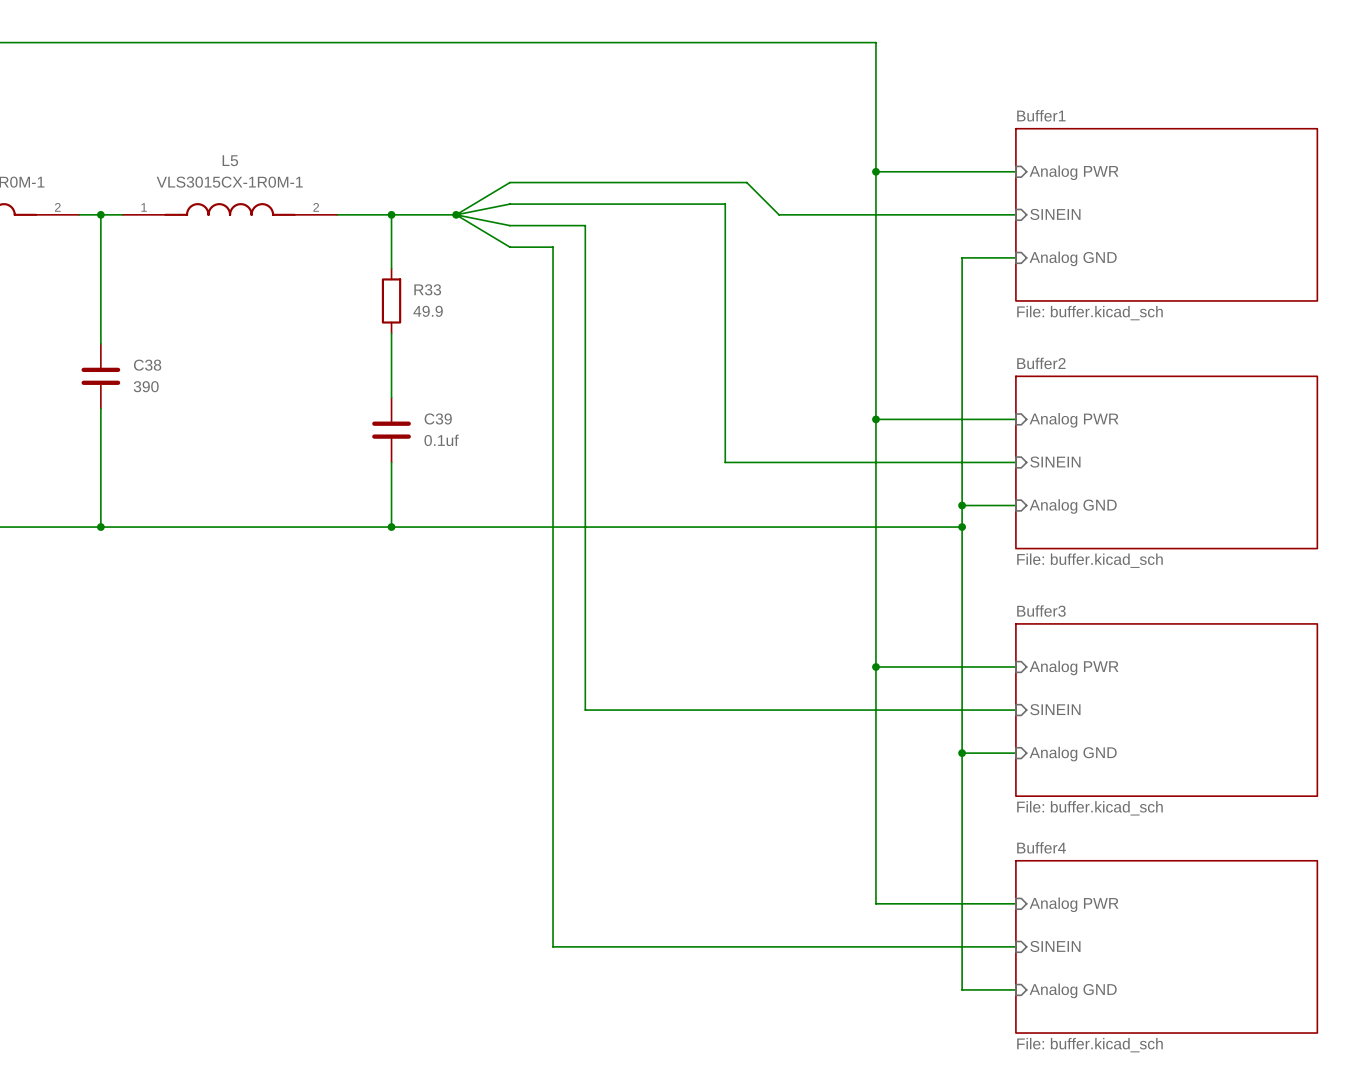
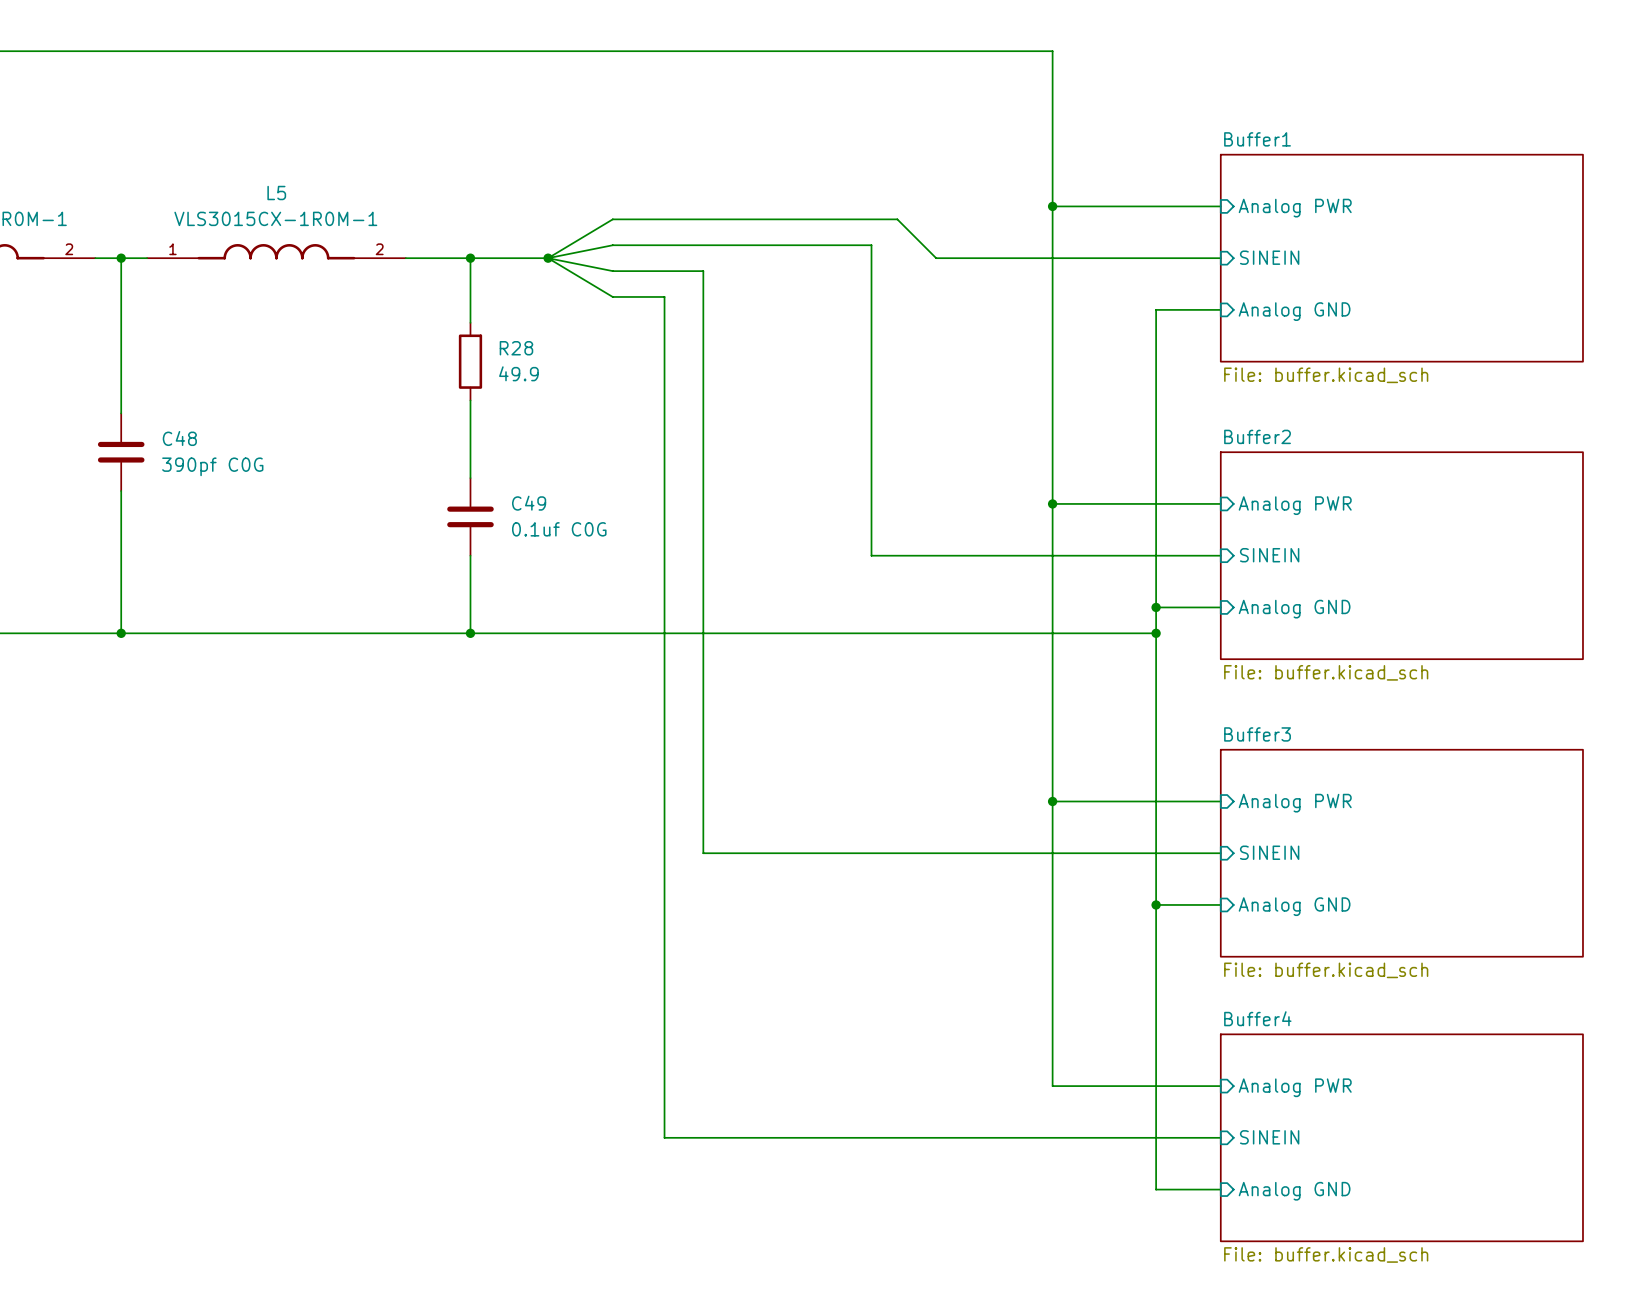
R33 name: R33 (427, 289) -> R28 (516, 348)
C38 name: C38 (147, 365) -> C48 (179, 438)
C38 value: 390 (146, 386) -> 390pf C0G (212, 466)
C39 name: C39 (438, 418) -> C49 (529, 503)
C39 value: 0.1uf (441, 440) -> 0.1uf C0G (559, 529)

